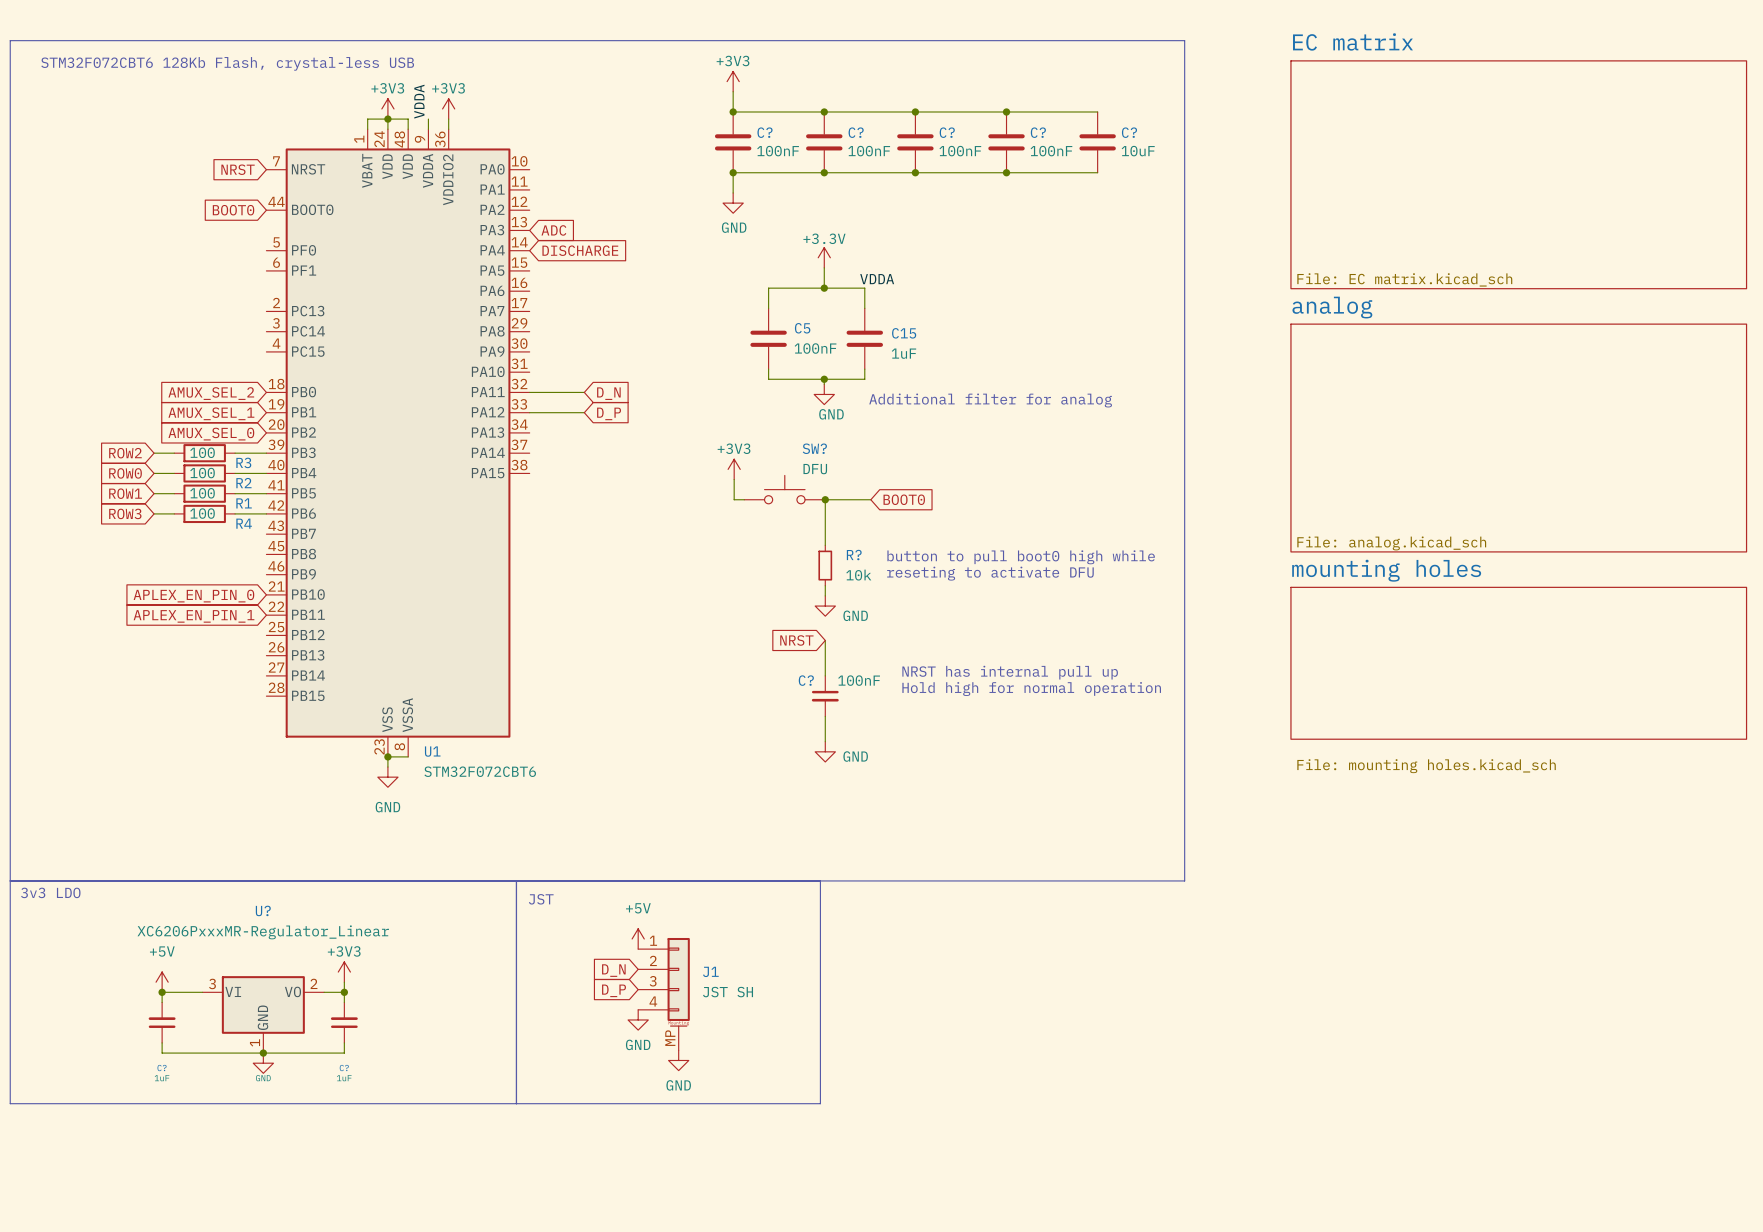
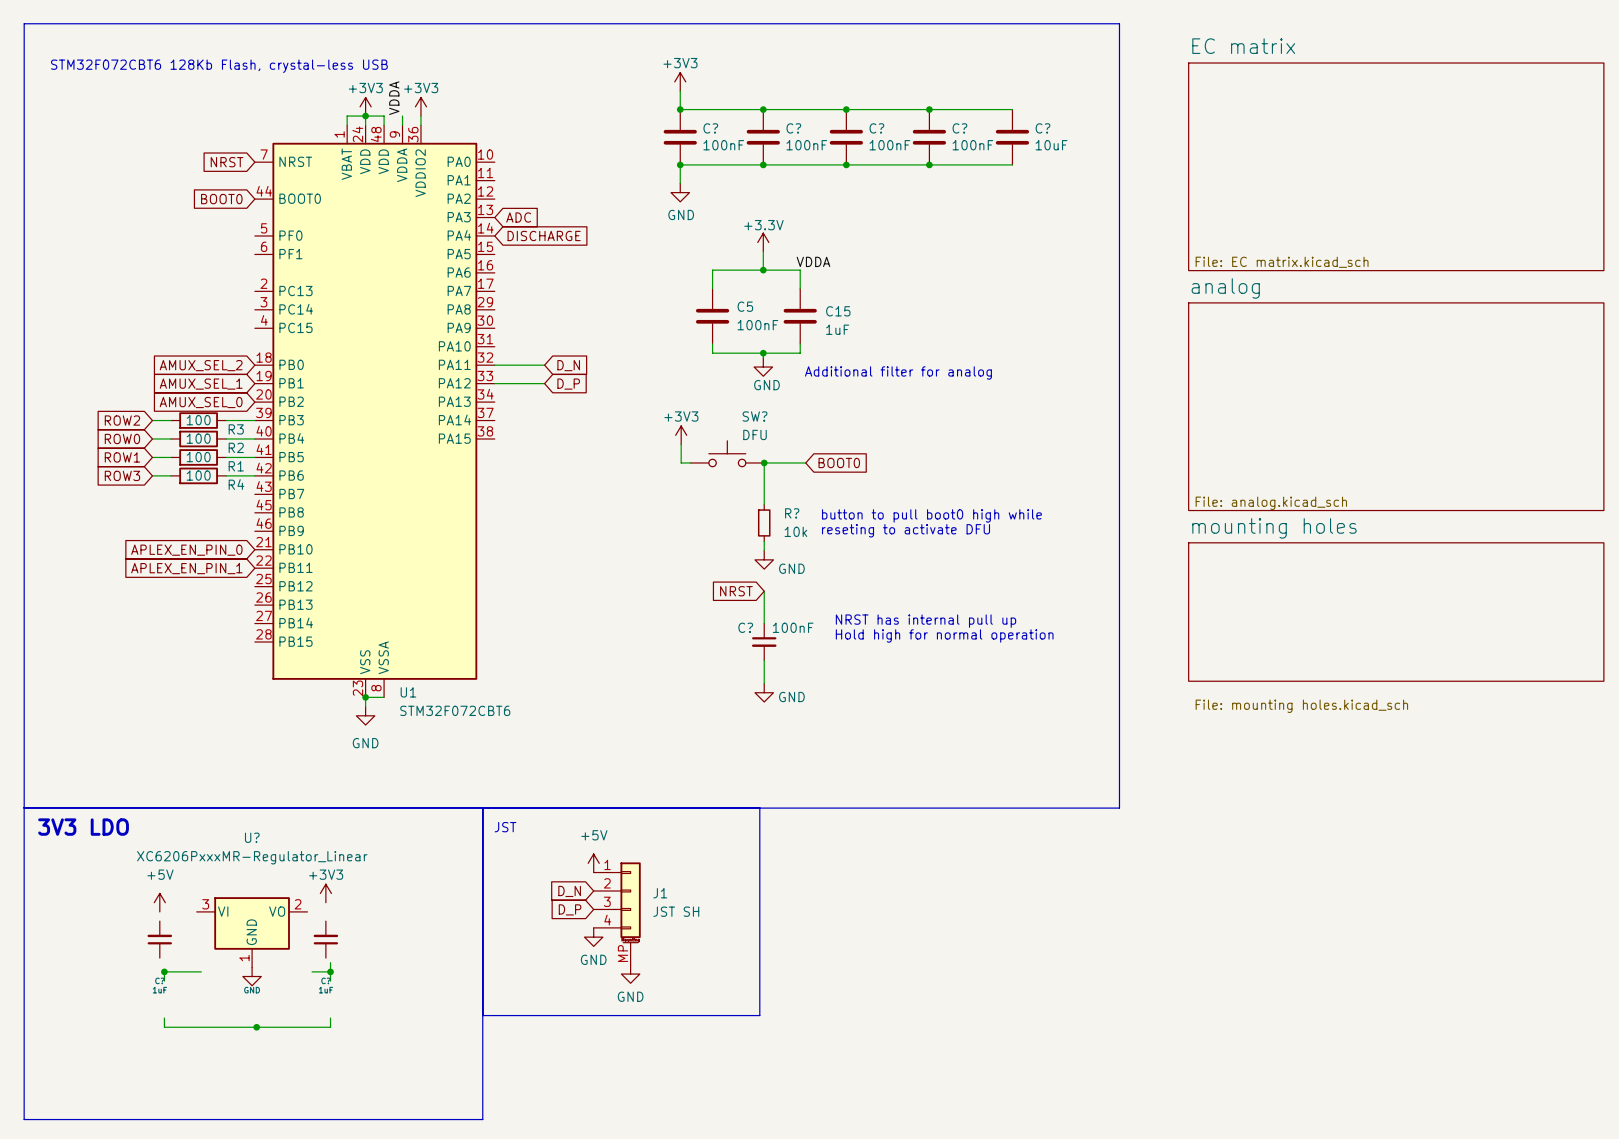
line: none -> (24, 23) (1119, 23) (1119, 808) (24, 808) (24, 23)
line: (10, 880) (1184, 880) (1184, 40) (10, 40) (10, 1103) (820, 1103) -> (759, 810) (759, 807) (482, 807) (482, 1015) (759, 1015) (759, 1013)
line: none -> (482, 810) (482, 807) (24, 807) (24, 1119) (482, 1119) (482, 1013)
text: 3v3 LDO (50, 892) -> 3V3 LDO (83, 827)
wire: (344, 982) (344, 1002) -> (330, 962) (330, 981)
junction: (162, 992) -> none
wire: (202, 992) (162, 992) (162, 1002) -> (201, 971) (164, 971) (164, 981)
wire: (324, 992) (344, 992) -> (312, 971) (330, 971)
junction: (344, 992) -> none
wire: (162, 1042) (162, 1053) (344, 1053) (344, 1042) -> (164, 1018) (164, 1027) (330, 1027) (330, 1018)
junction: (263, 1053) -> none
junction: none -> (164, 971)
junction: none -> (330, 971)
junction: none -> (256, 1027)

